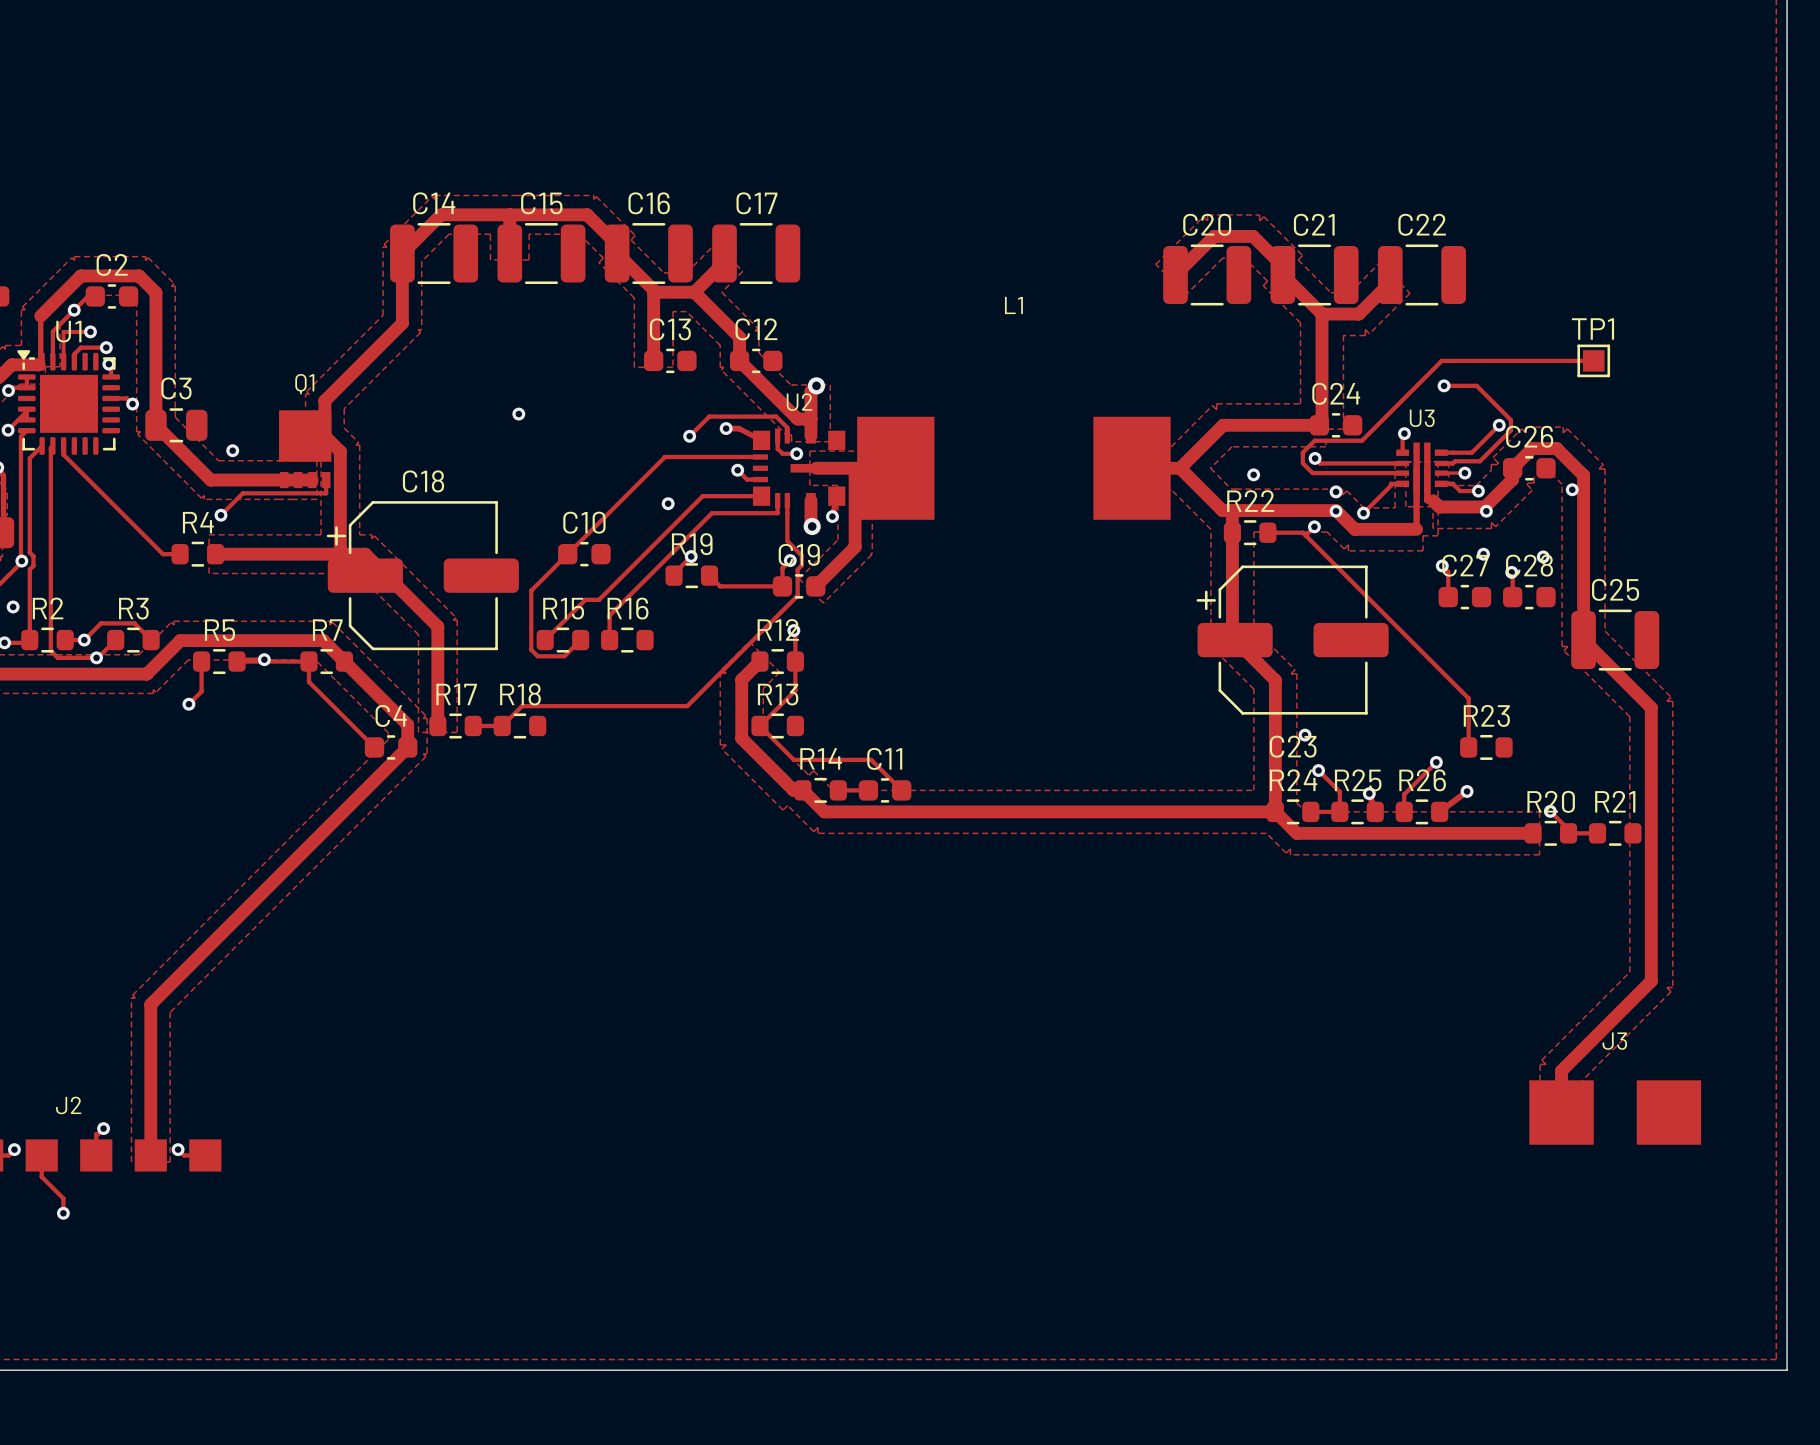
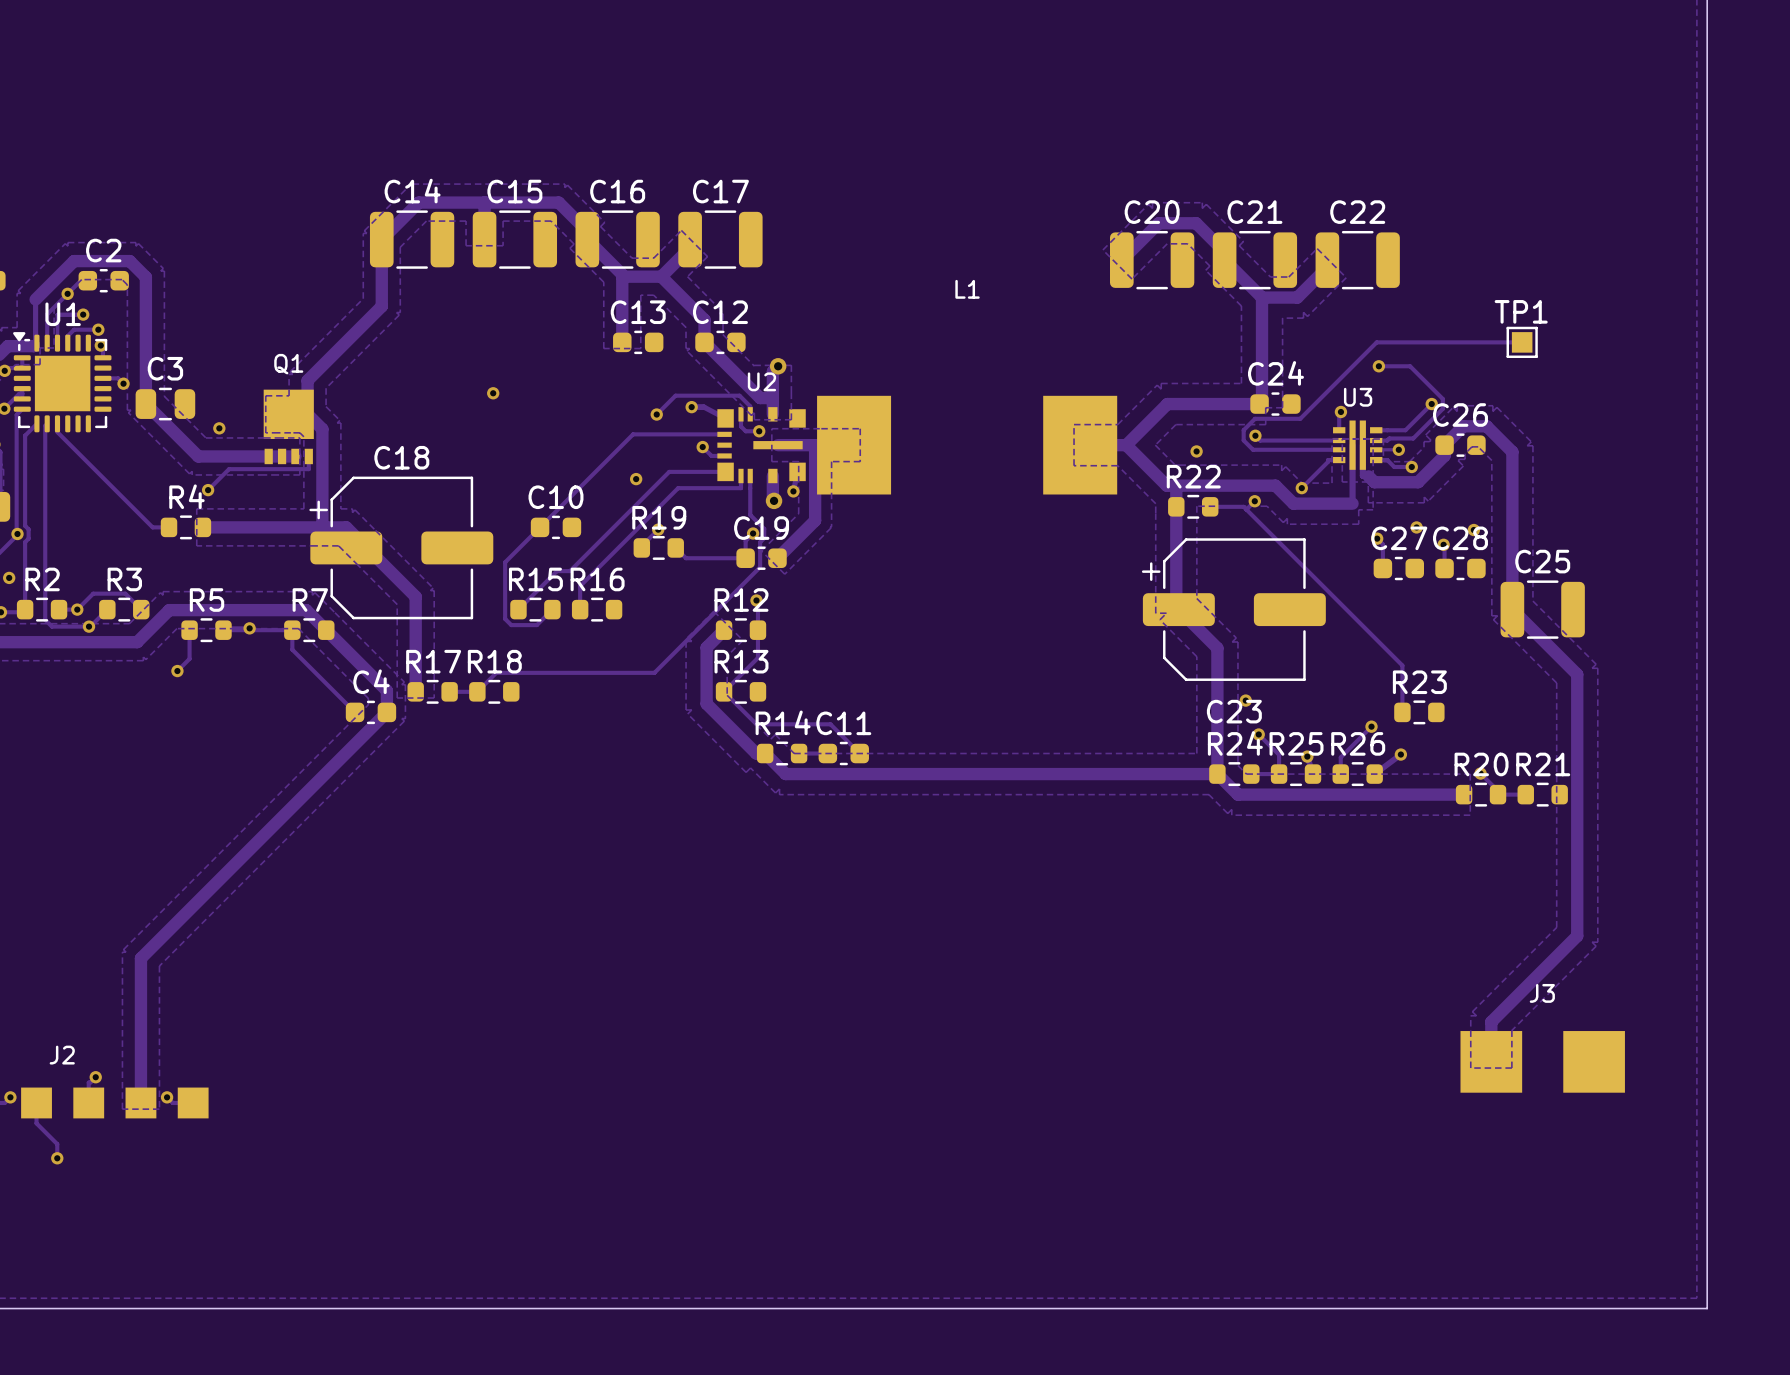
via: (1572, 489) -> none
via: (1336, 491) -> none
via: (1336, 511) -> none
via: (1486, 511) -> none

